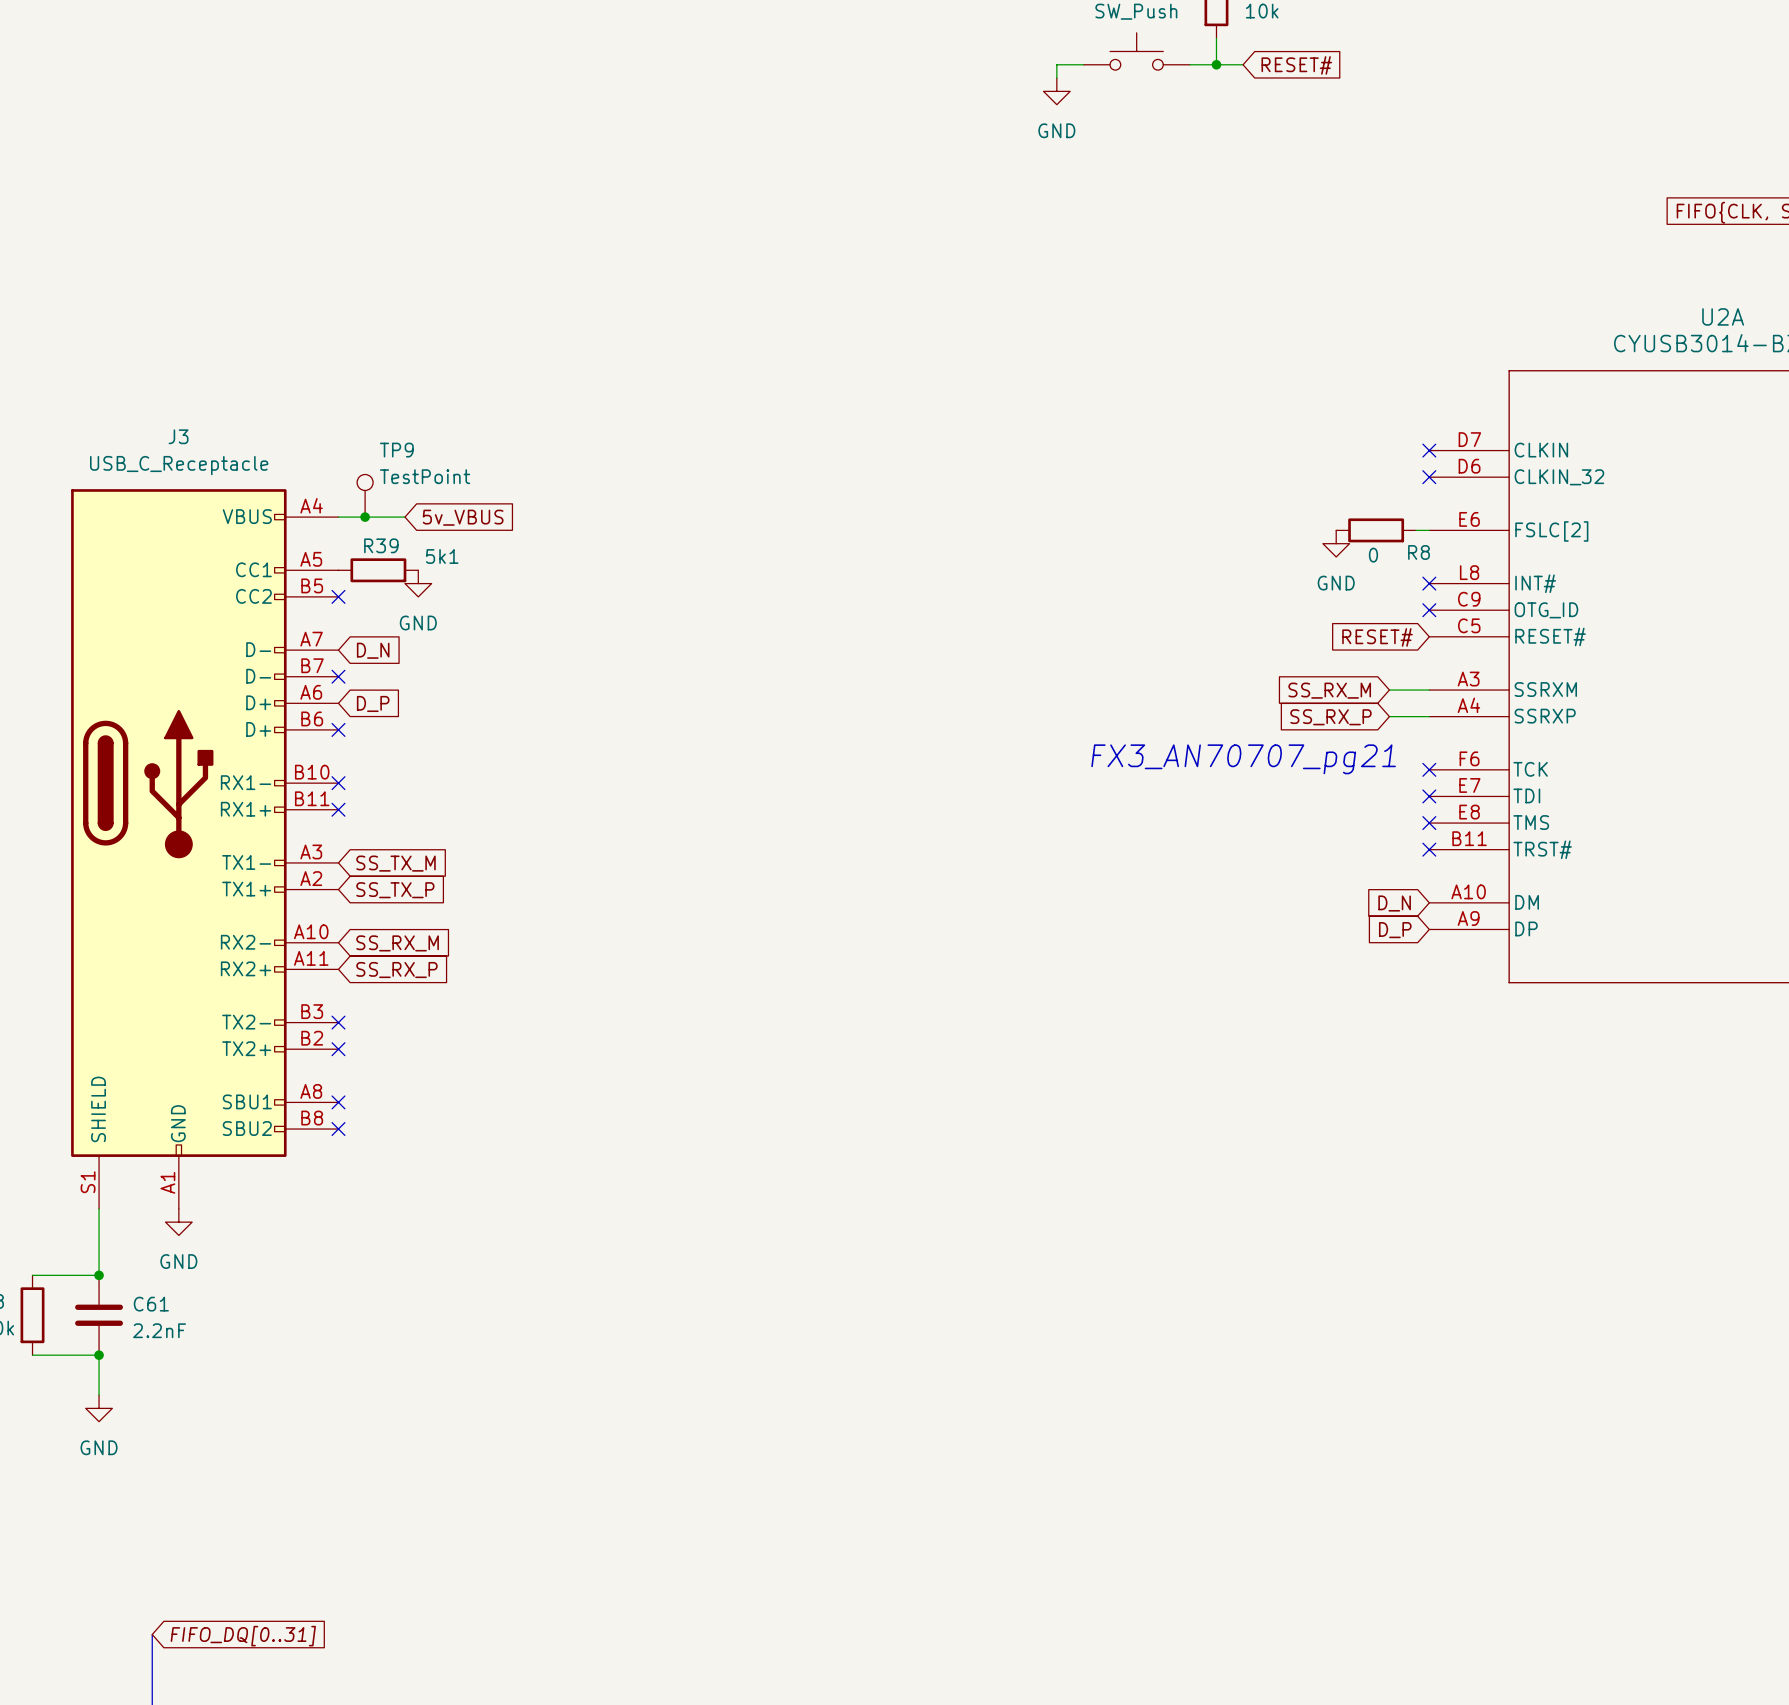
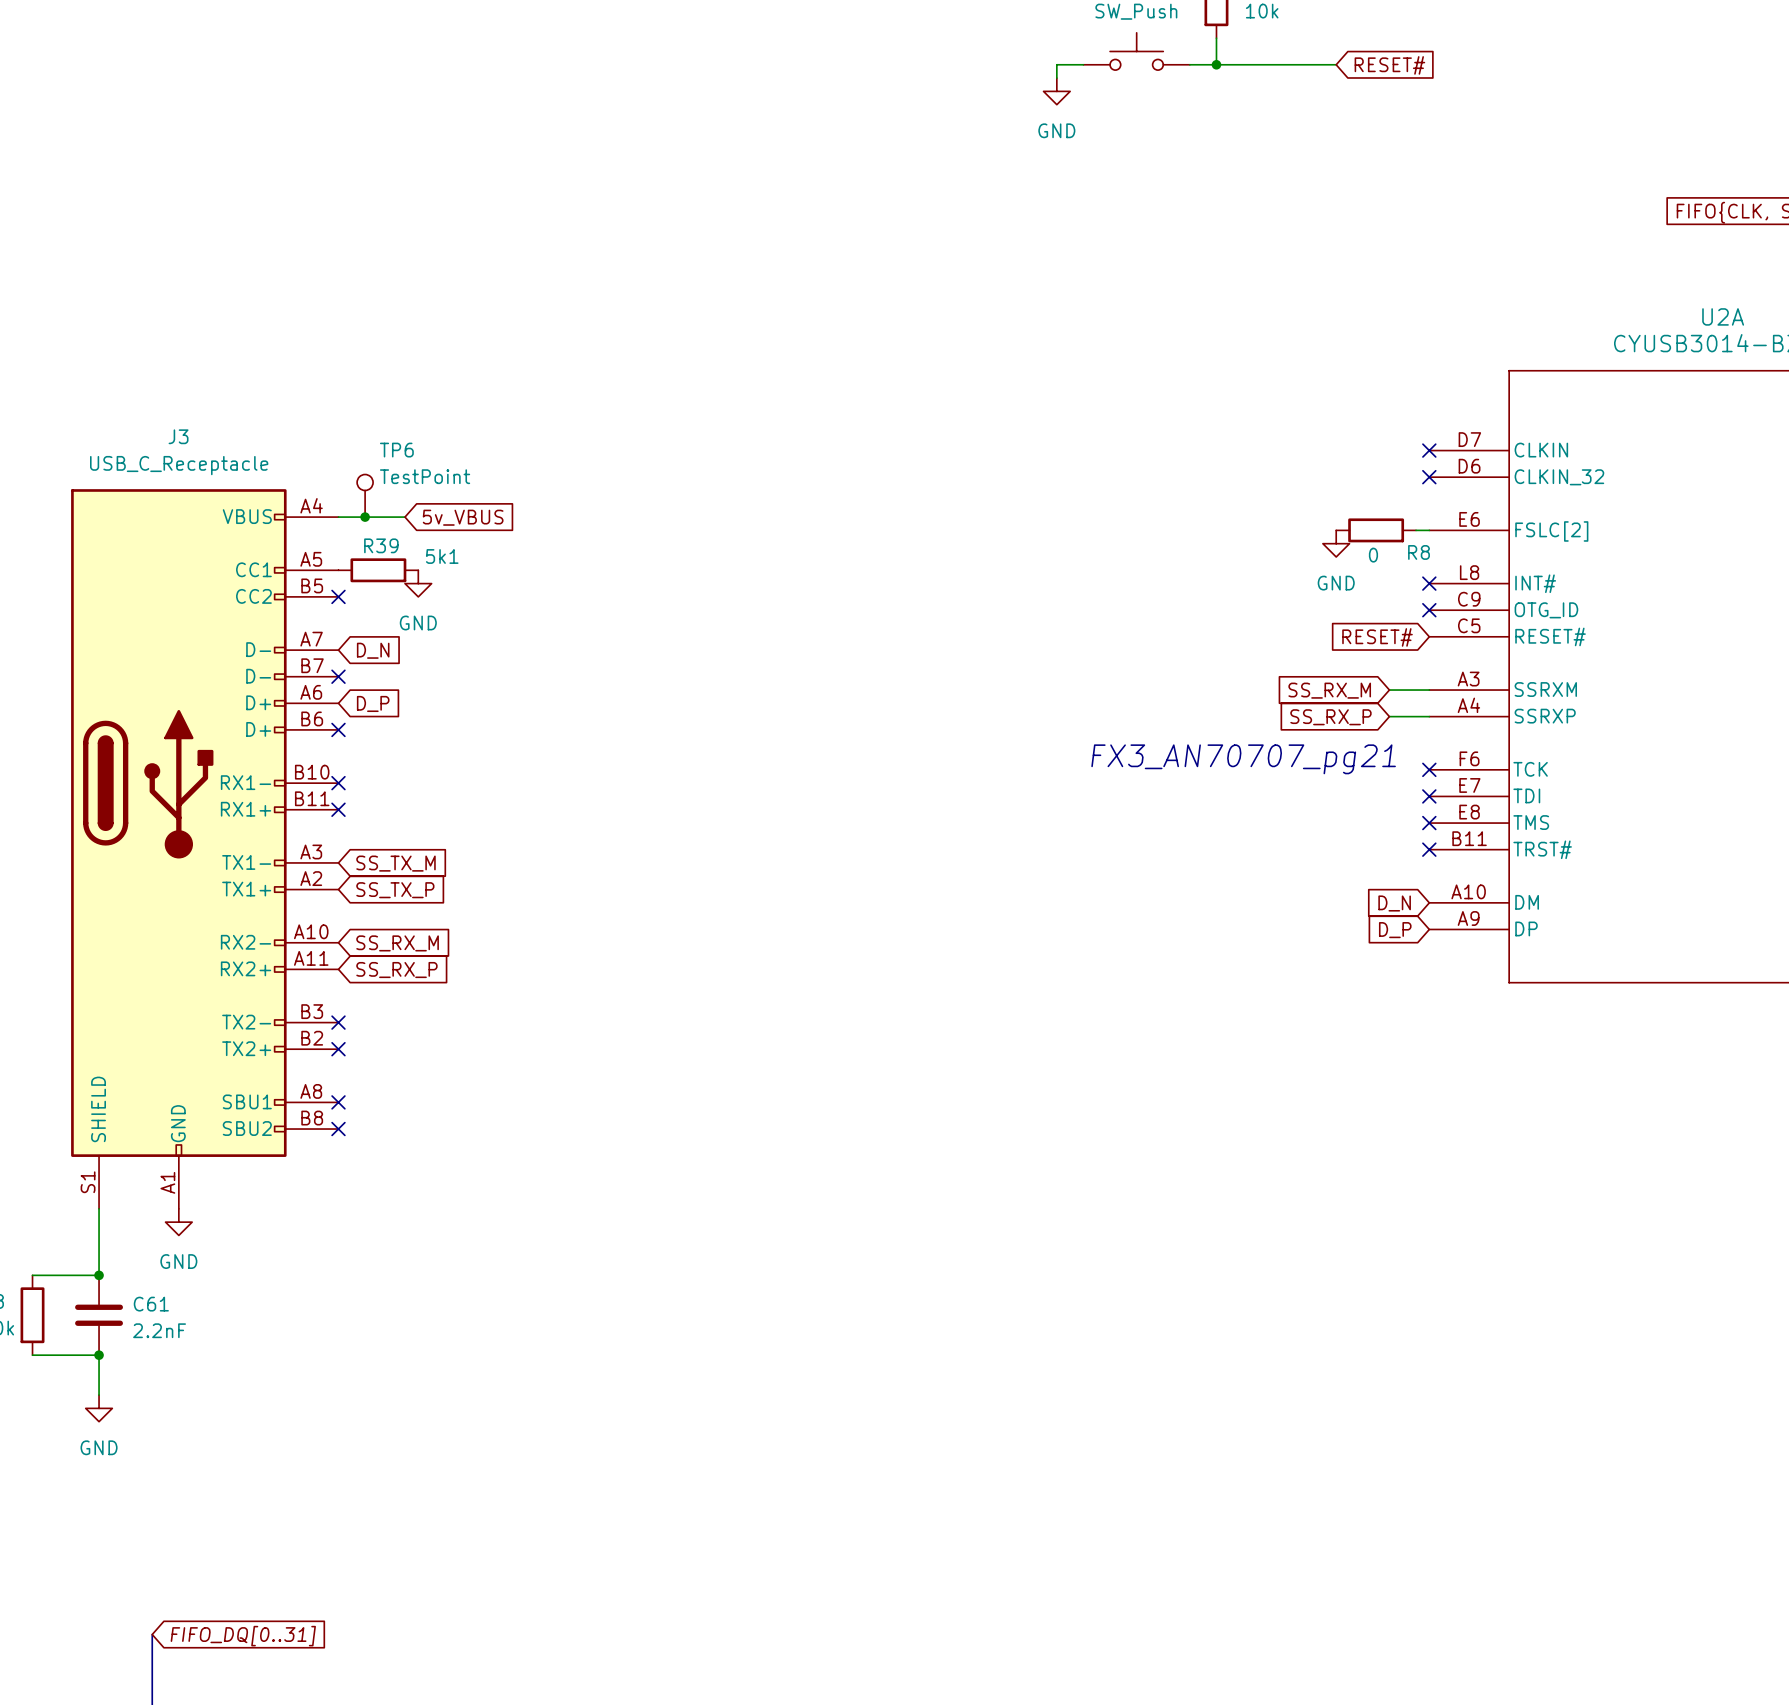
wire: none -> (1243, 64) (1336, 64)
global label position: RESET# (1296, 65) -> RESET# (1389, 65)
TP9 name: TP9 (396, 450) -> TP6 (396, 450)

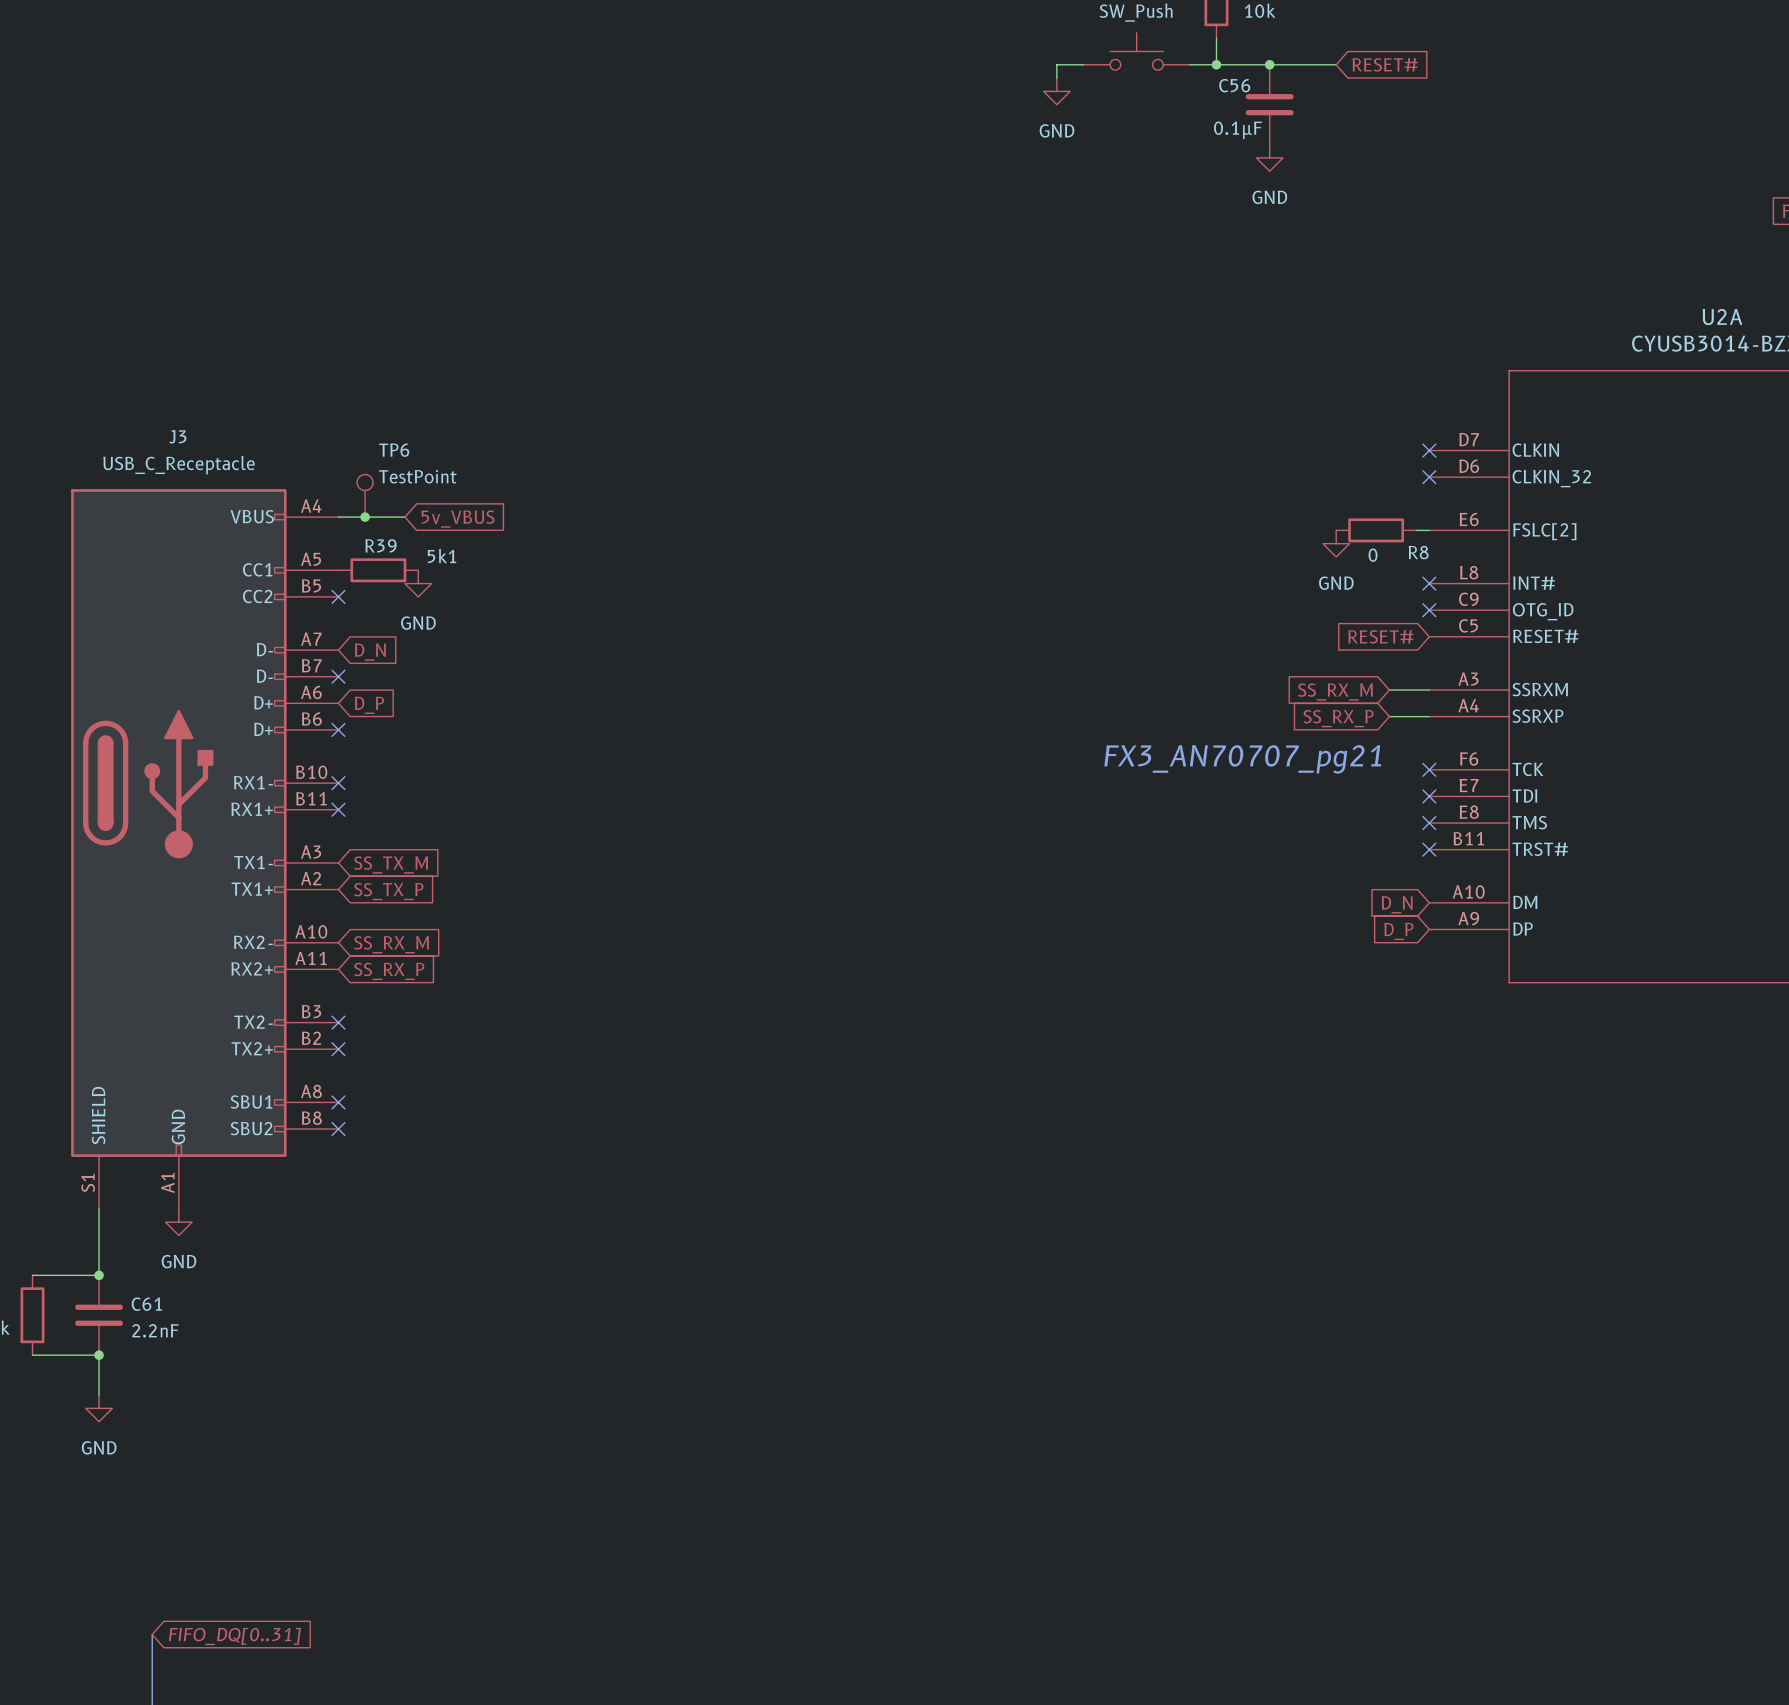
junction: none -> (1269, 64)
C56: none -> 0.1µF (1269, 104)
power symbol: none -> GND (1269, 157)

